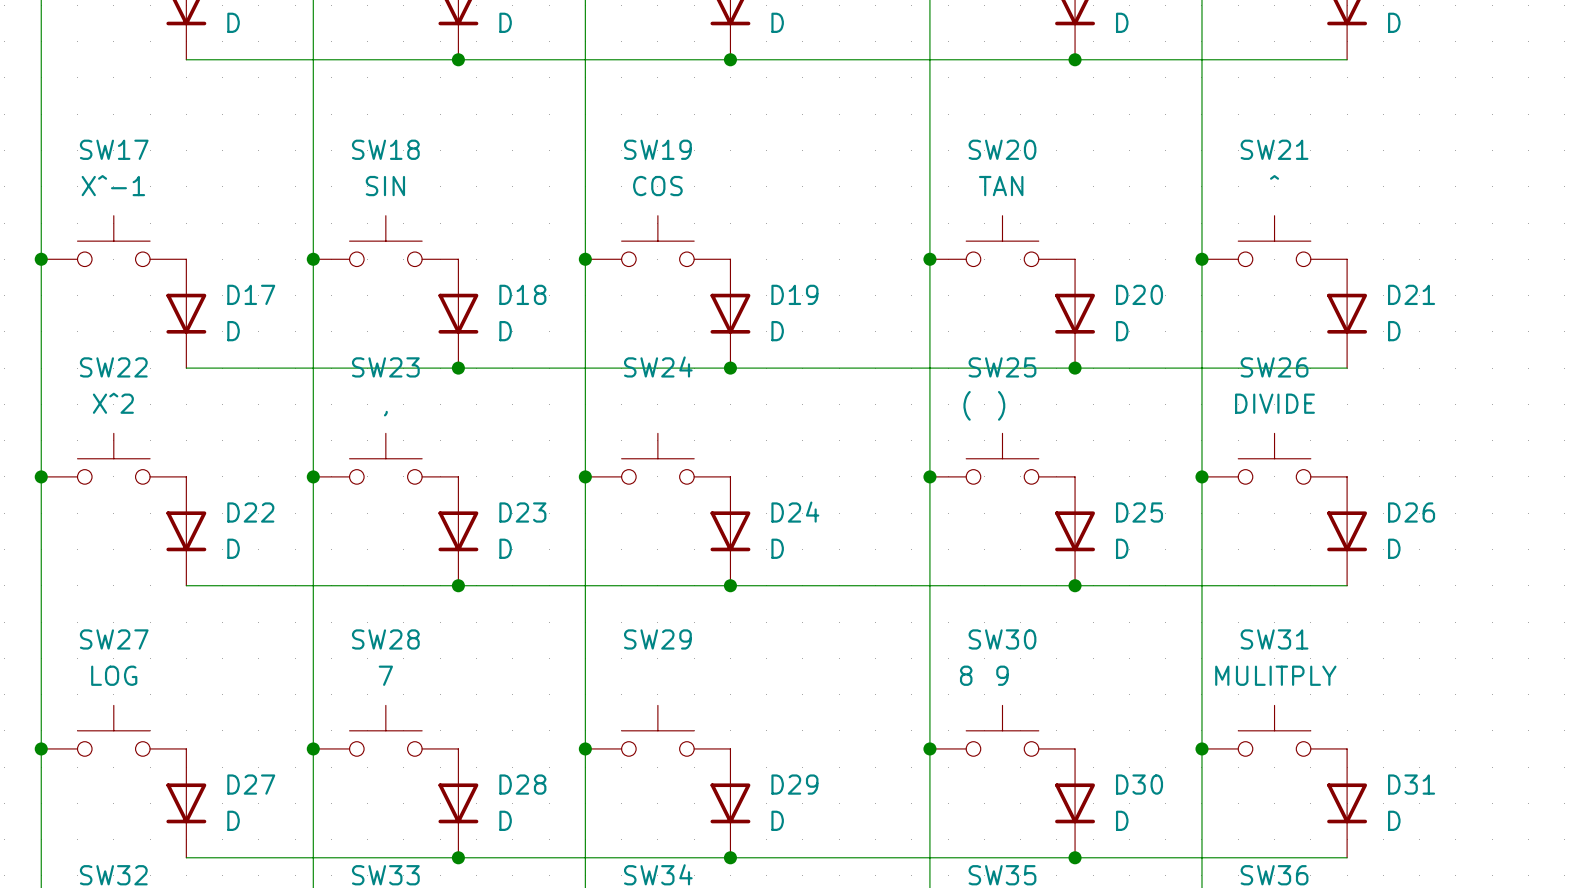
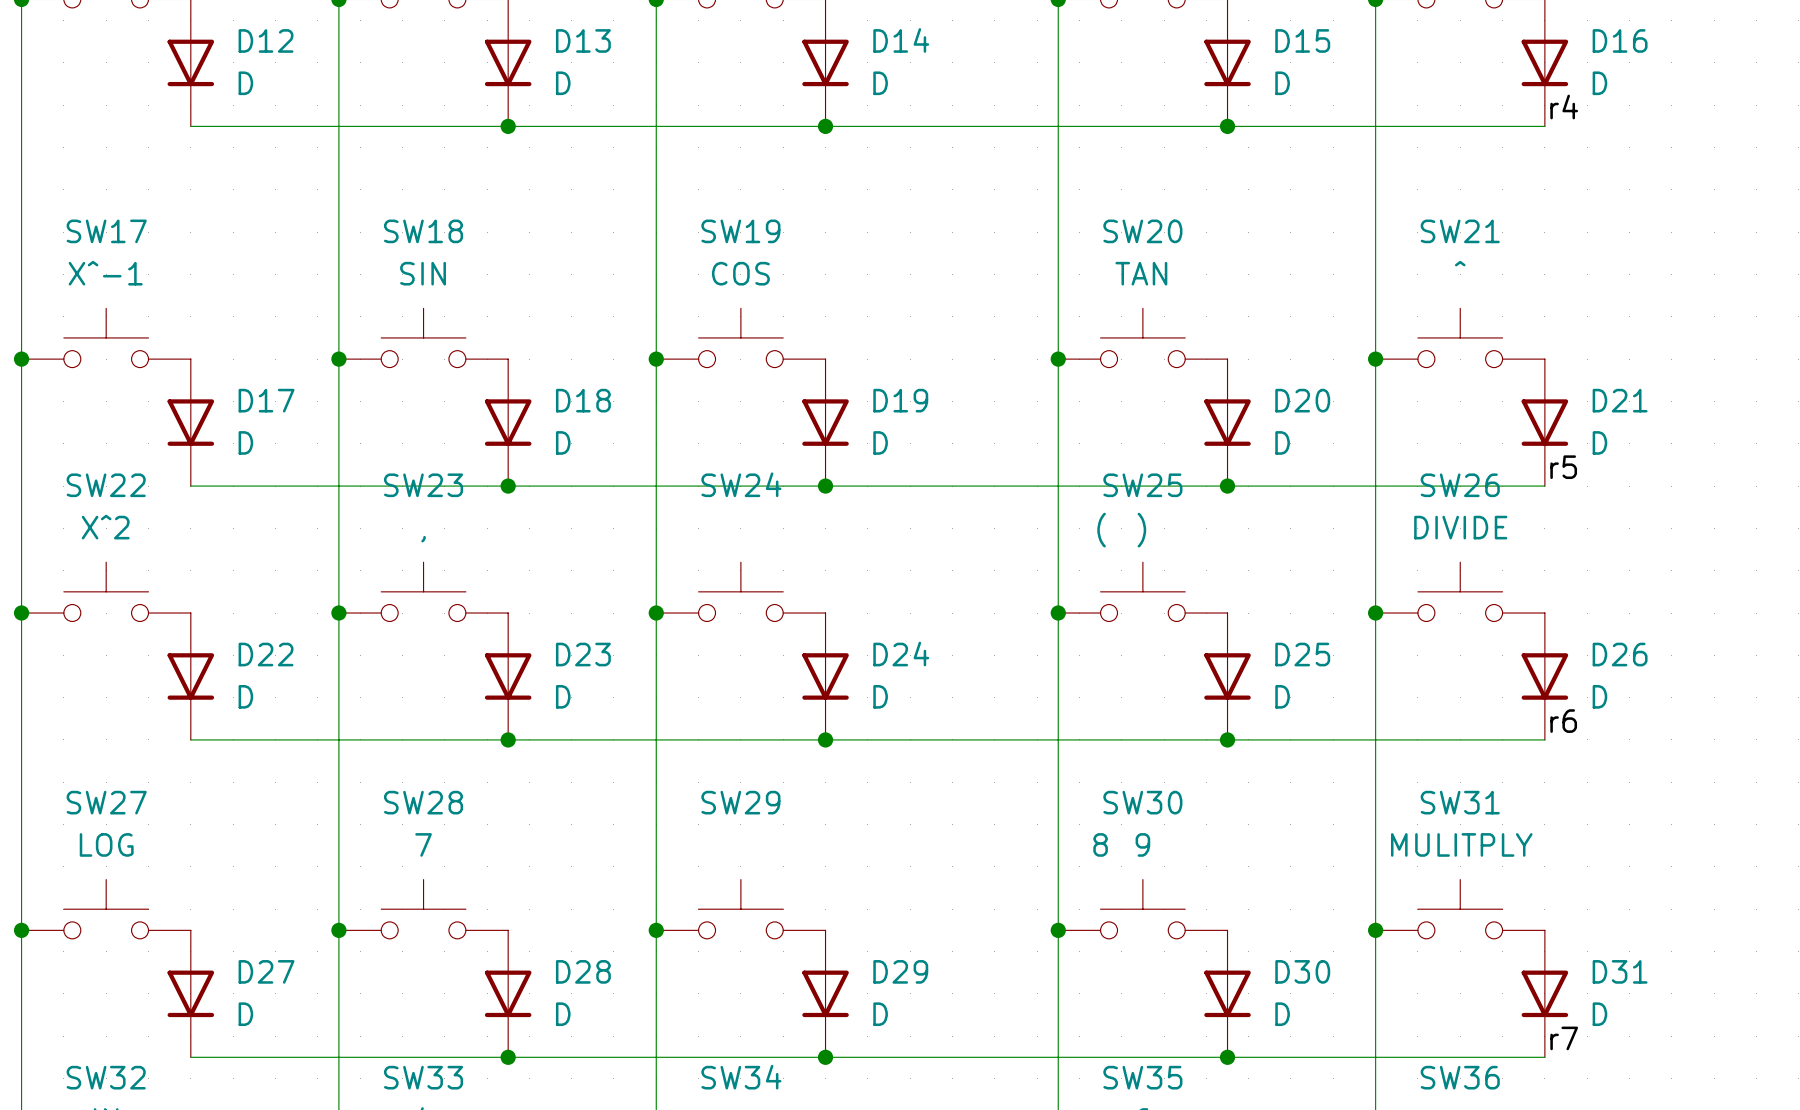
label: none -> r4 (1564, 107)
label: none -> r5 (1563, 467)
label: none -> r6 (1563, 721)
label: none -> r7 (1564, 1038)

